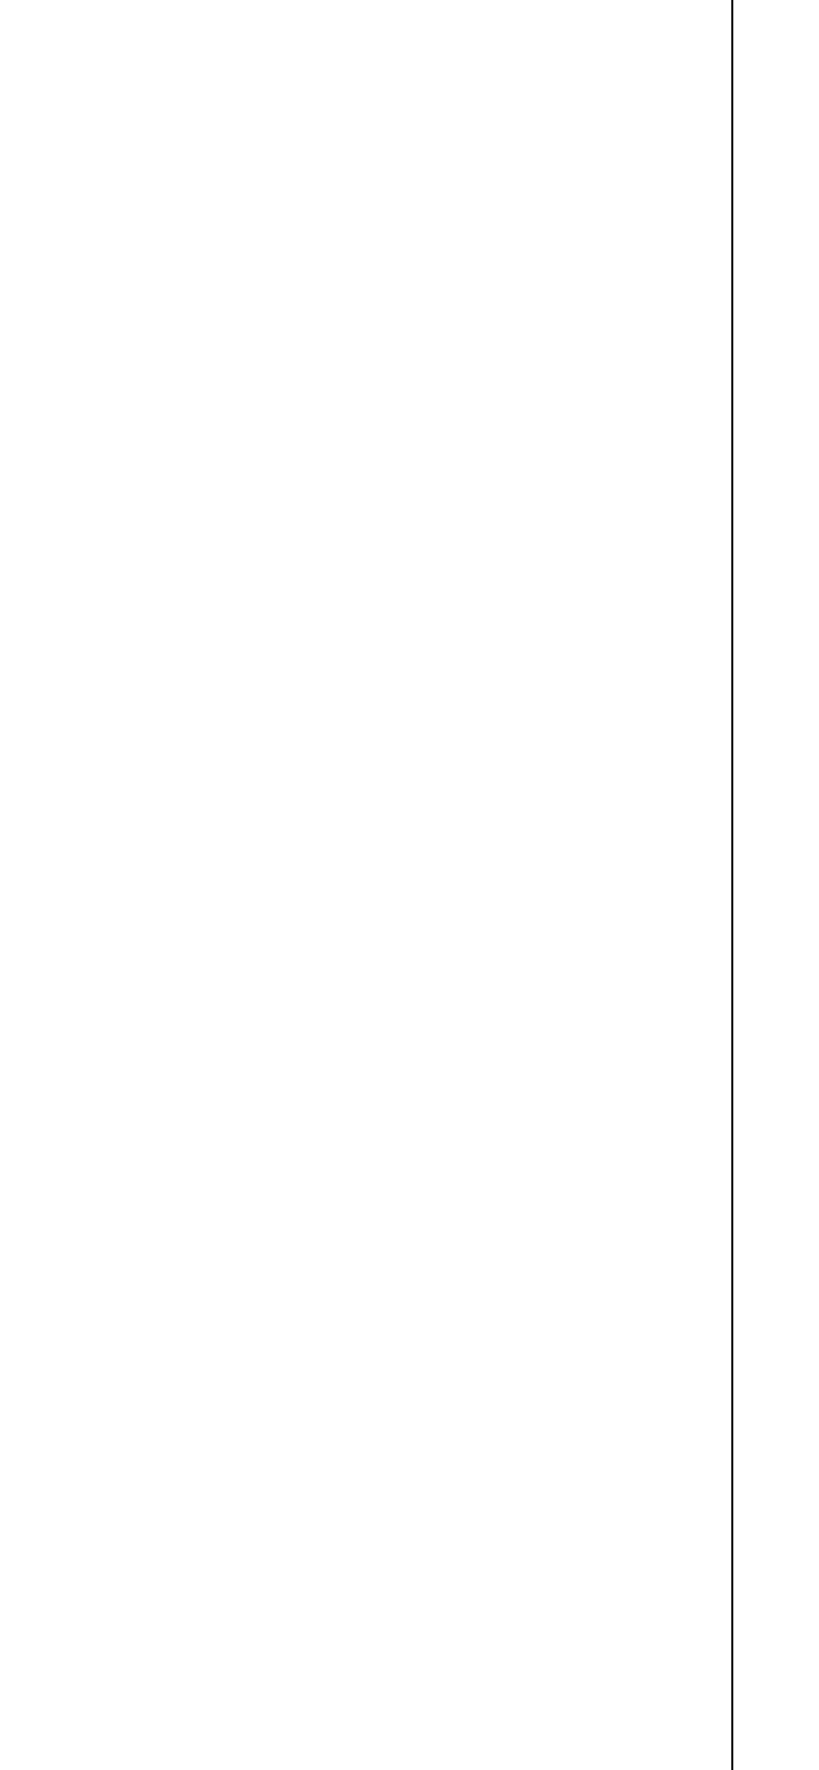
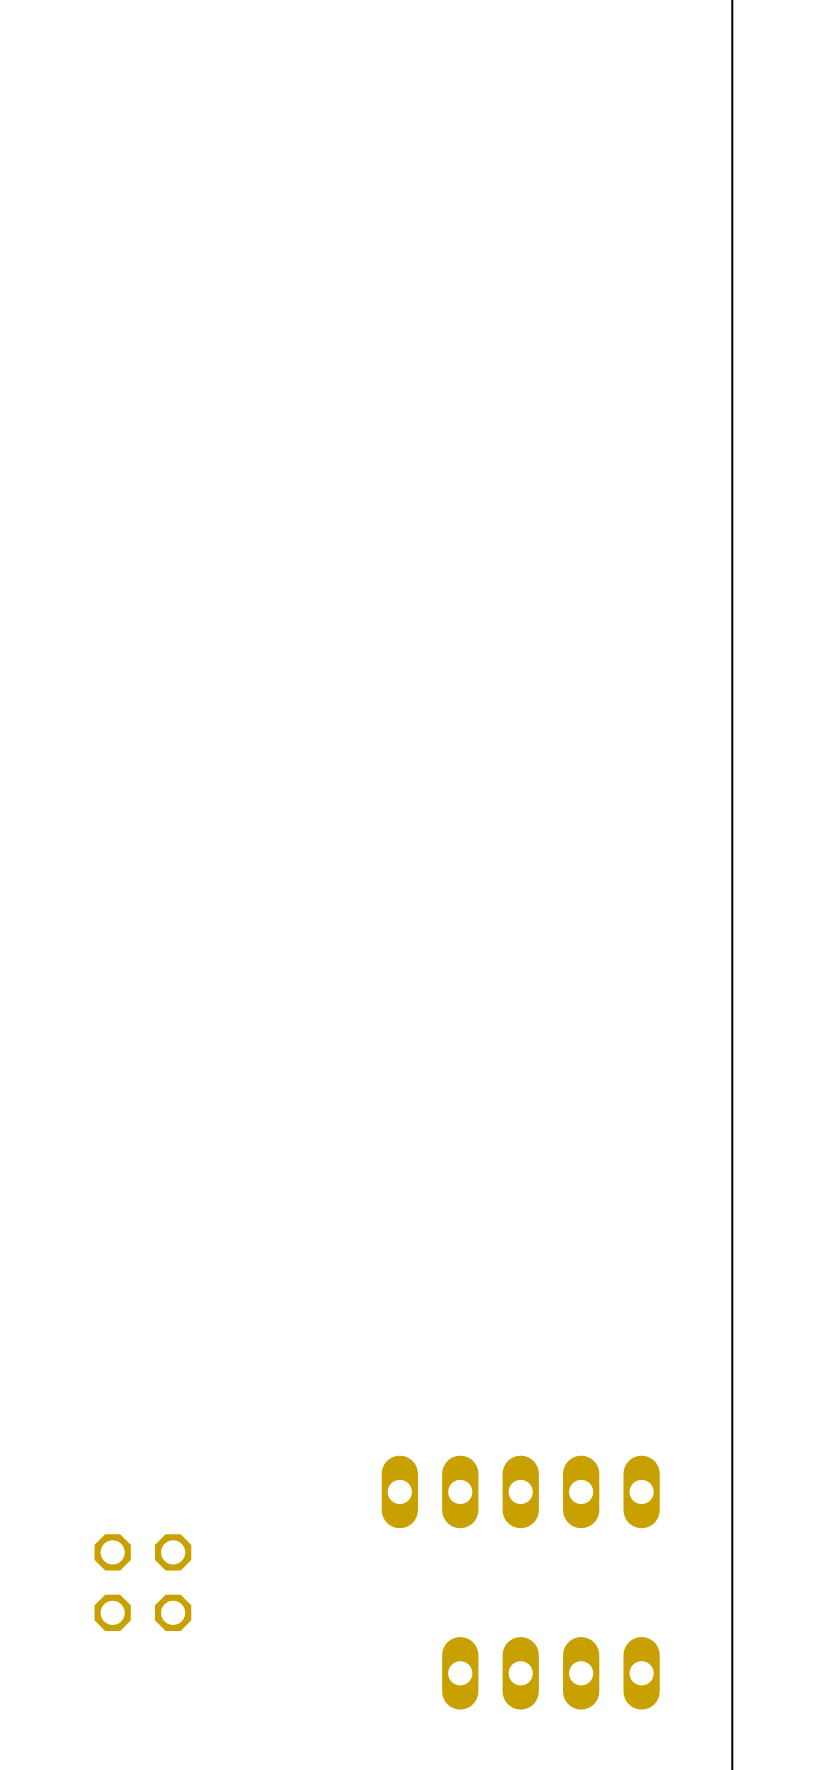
part: none -> (520, 1491)
part: none -> (142, 1582)
part: none -> (550, 1673)

